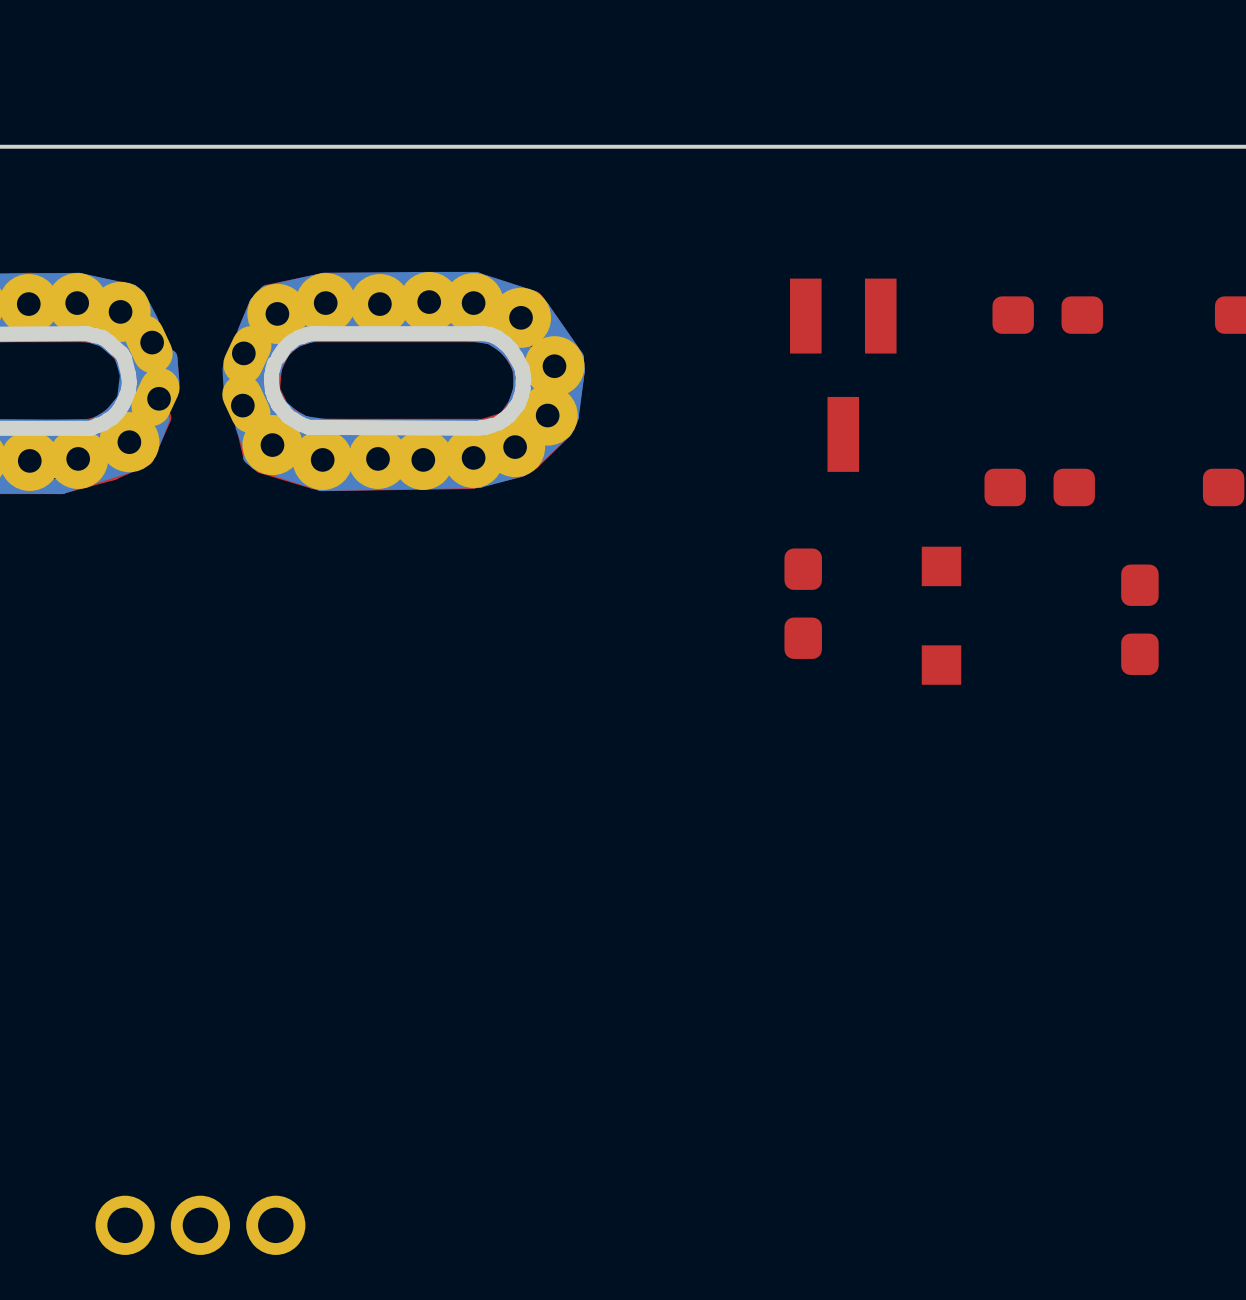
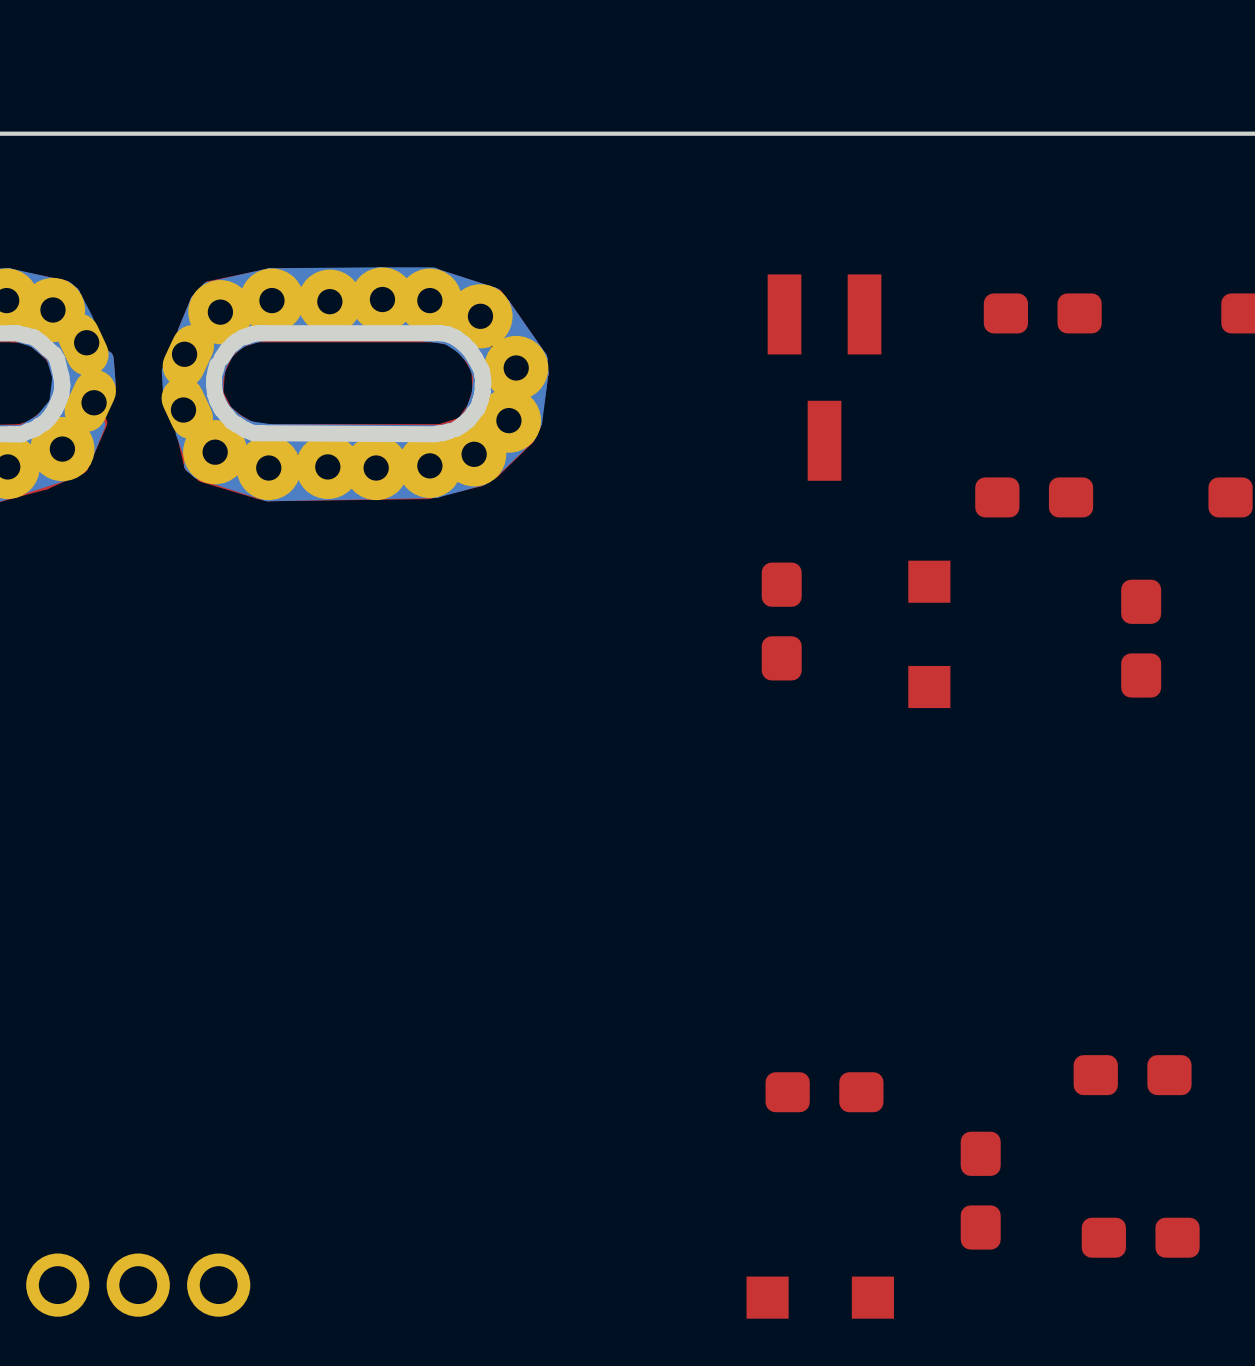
part: none -> (1132, 1075)
part: none -> (824, 1092)
part: none -> (980, 1190)
part: none -> (1140, 1237)
part: none -> (820, 1297)

